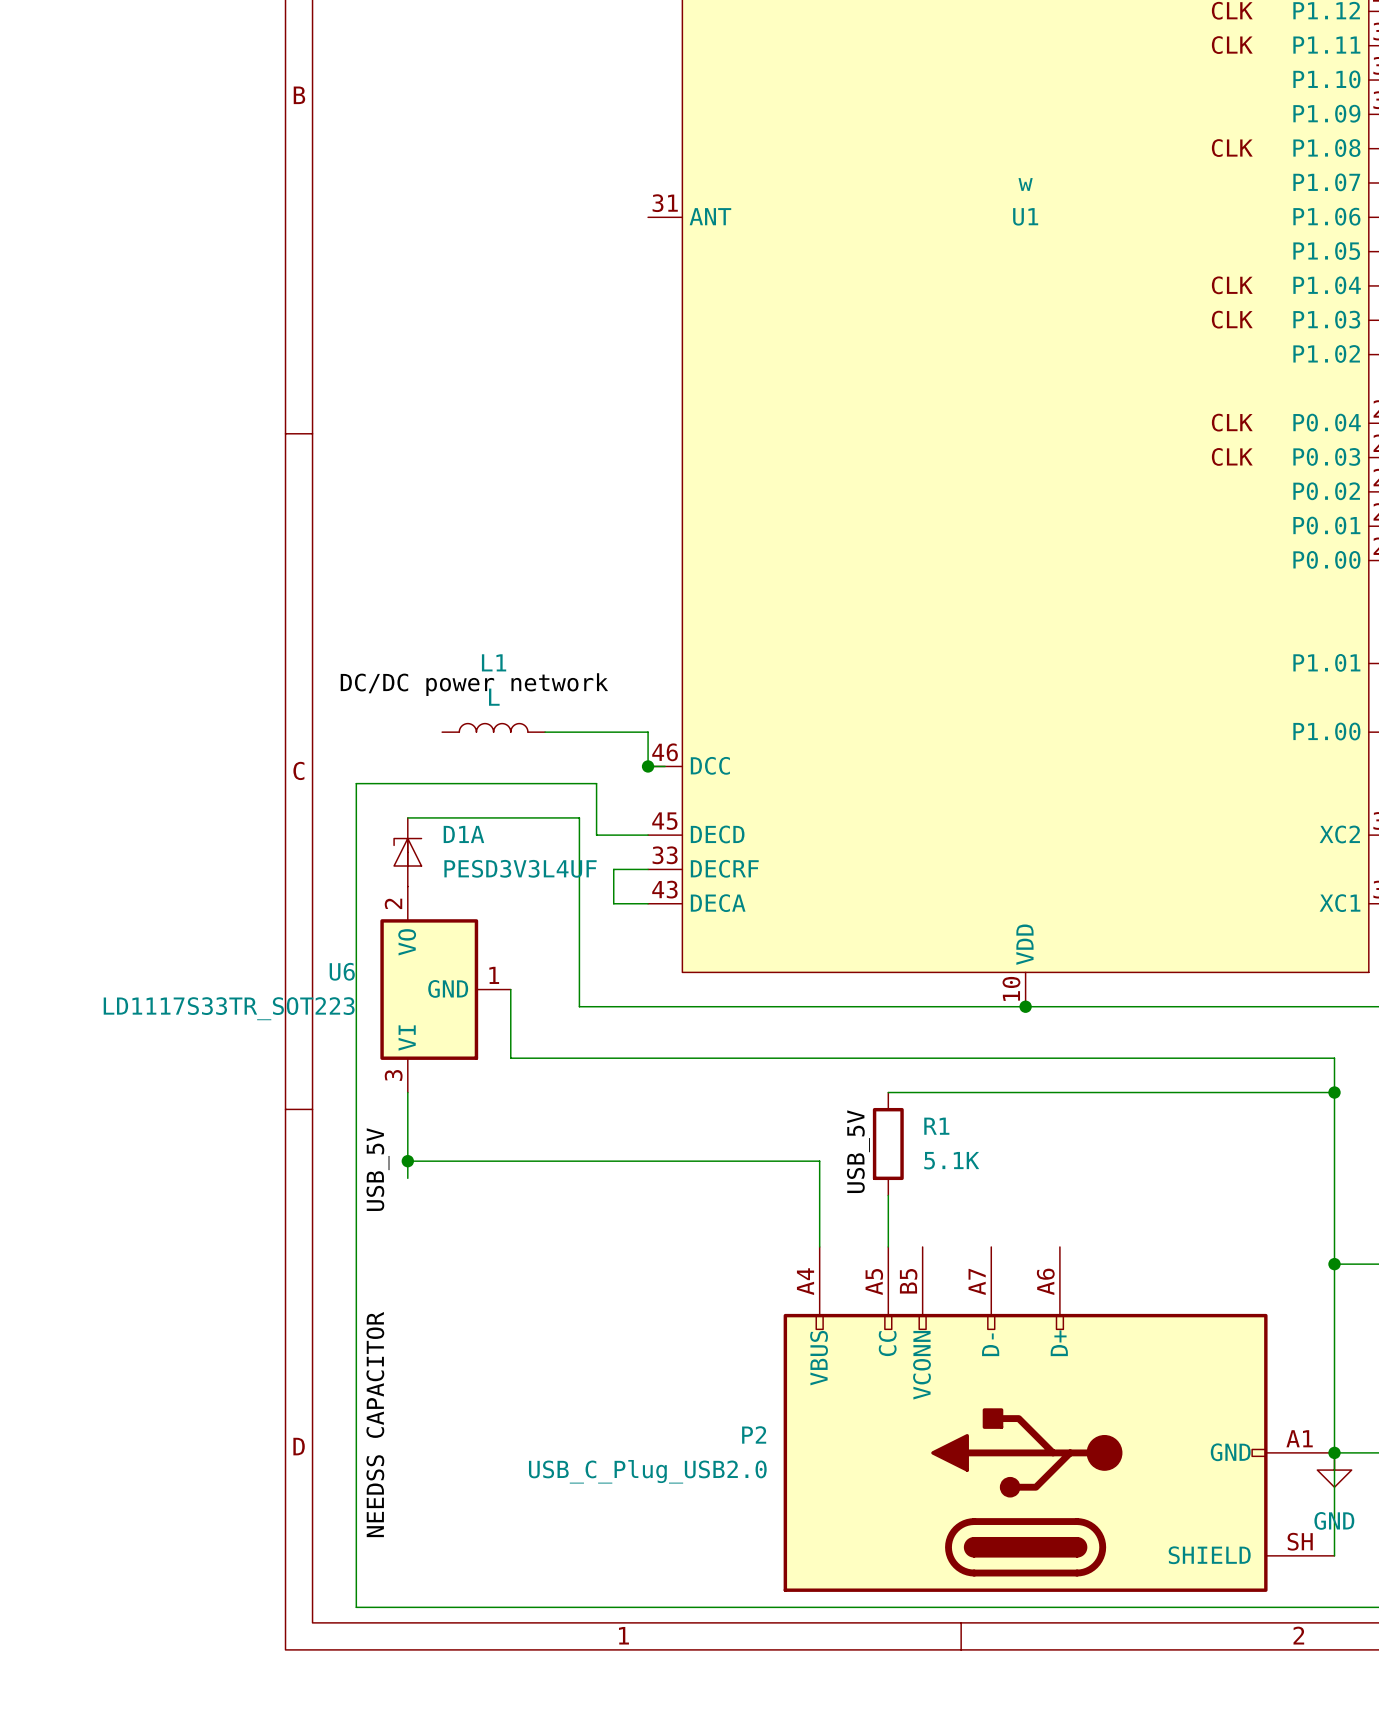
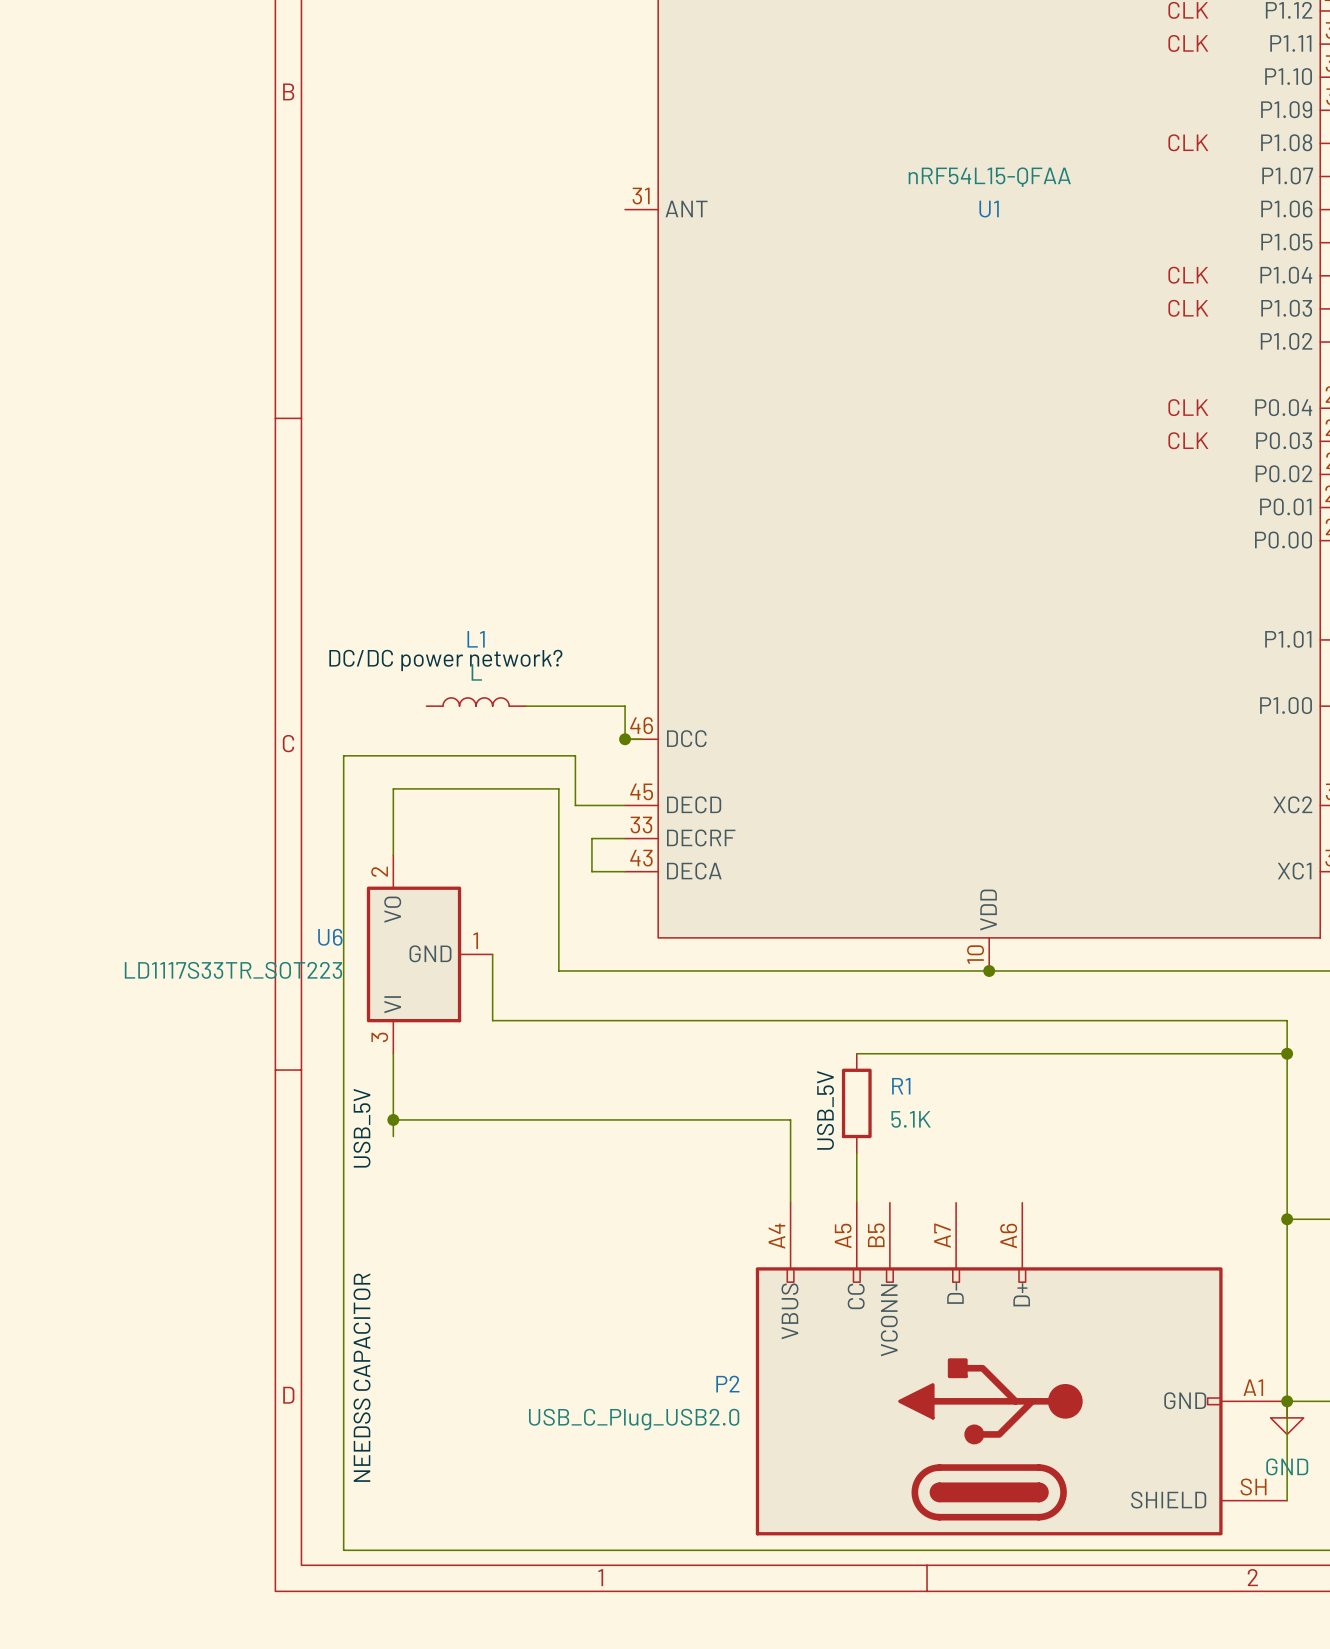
U1 value: w (1025, 184) -> nRF54L15-QFAA (989, 177)
label: DC/DC power network (474, 684) -> DC/DC power network? (445, 660)
D1A: PESD3V3L4UF (407, 852) -> none

